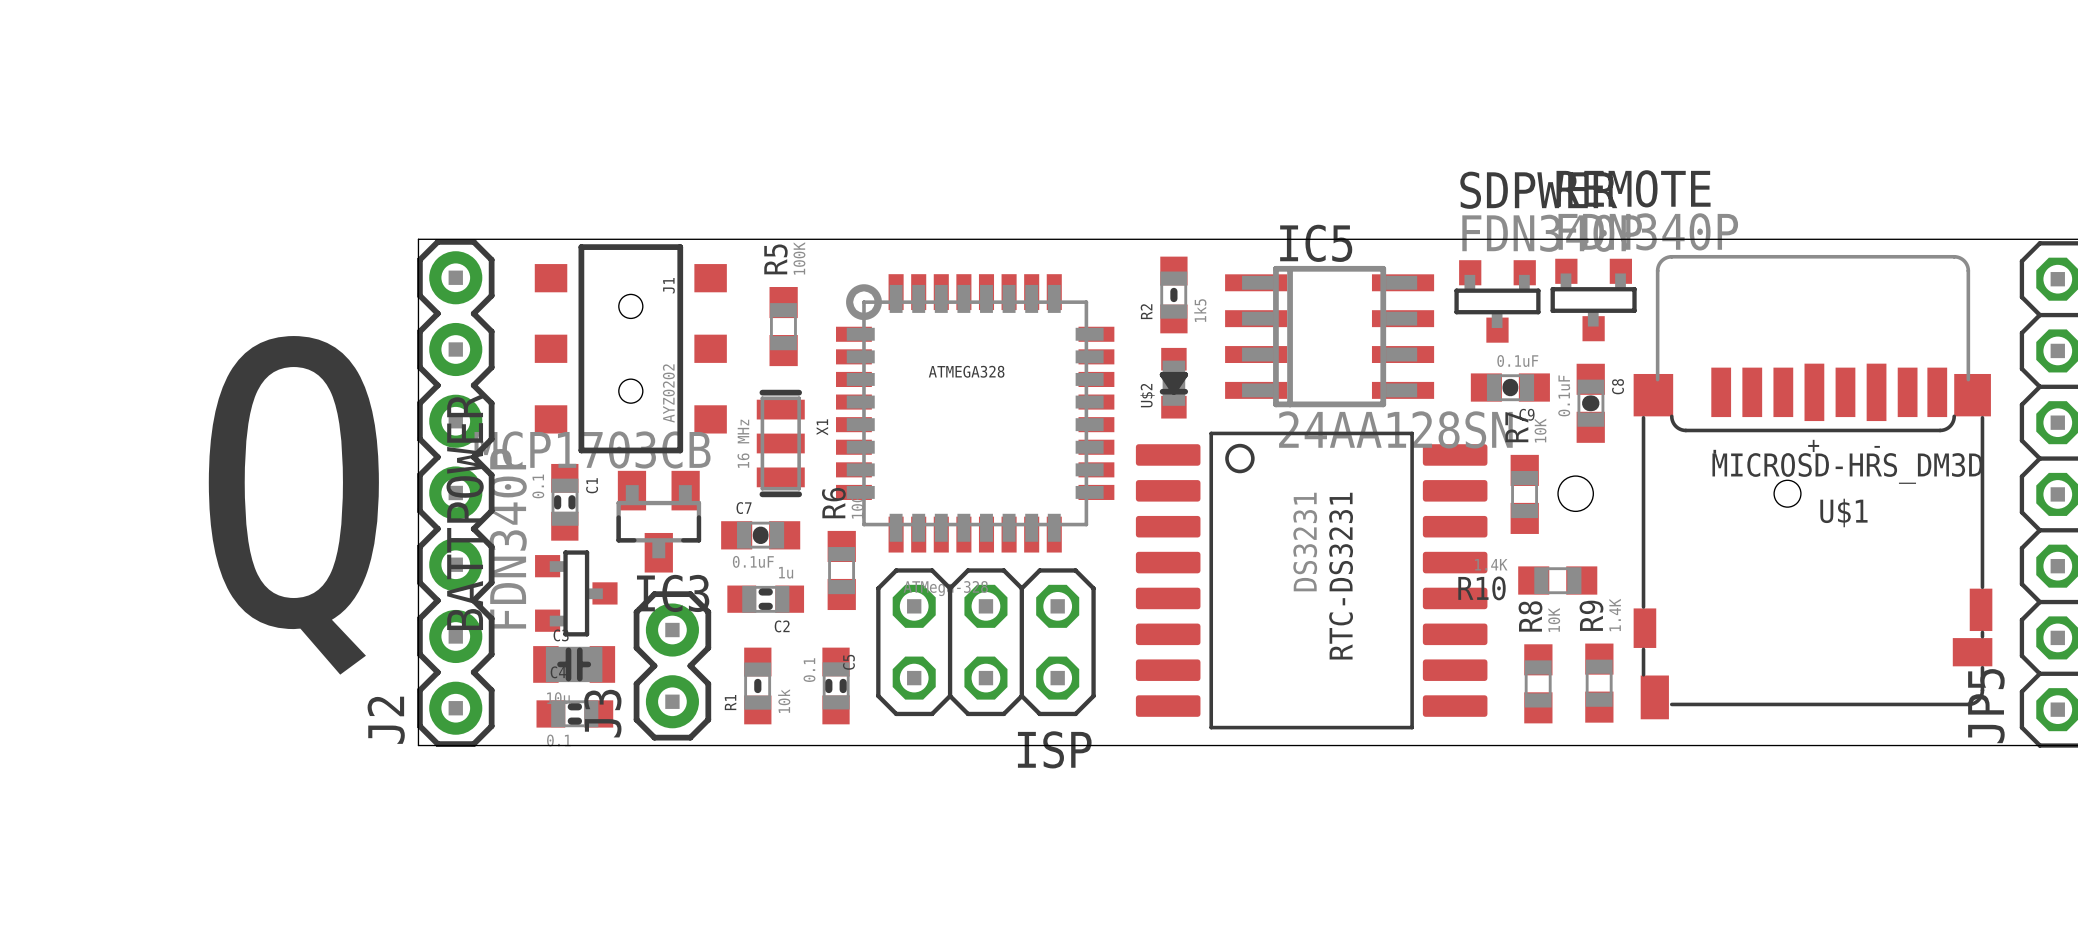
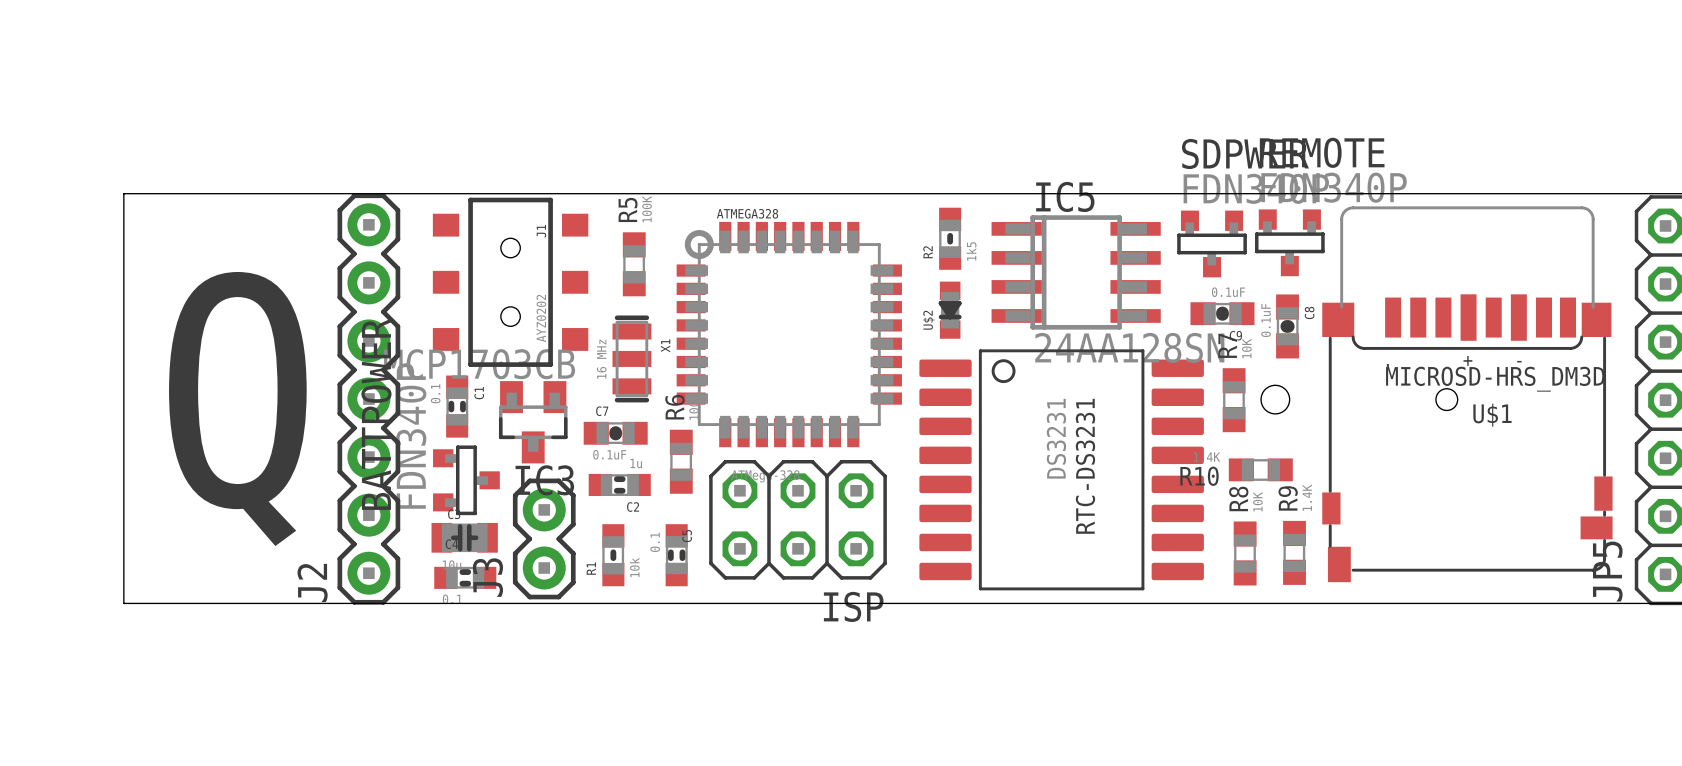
board edge: (418, 239) (418, 745) -> (338, 193) (123, 193) (123, 603) (338, 603)
ATMEGA328 name position: ATMEGA328 (966, 371) -> ATMEGA328 (747, 213)

